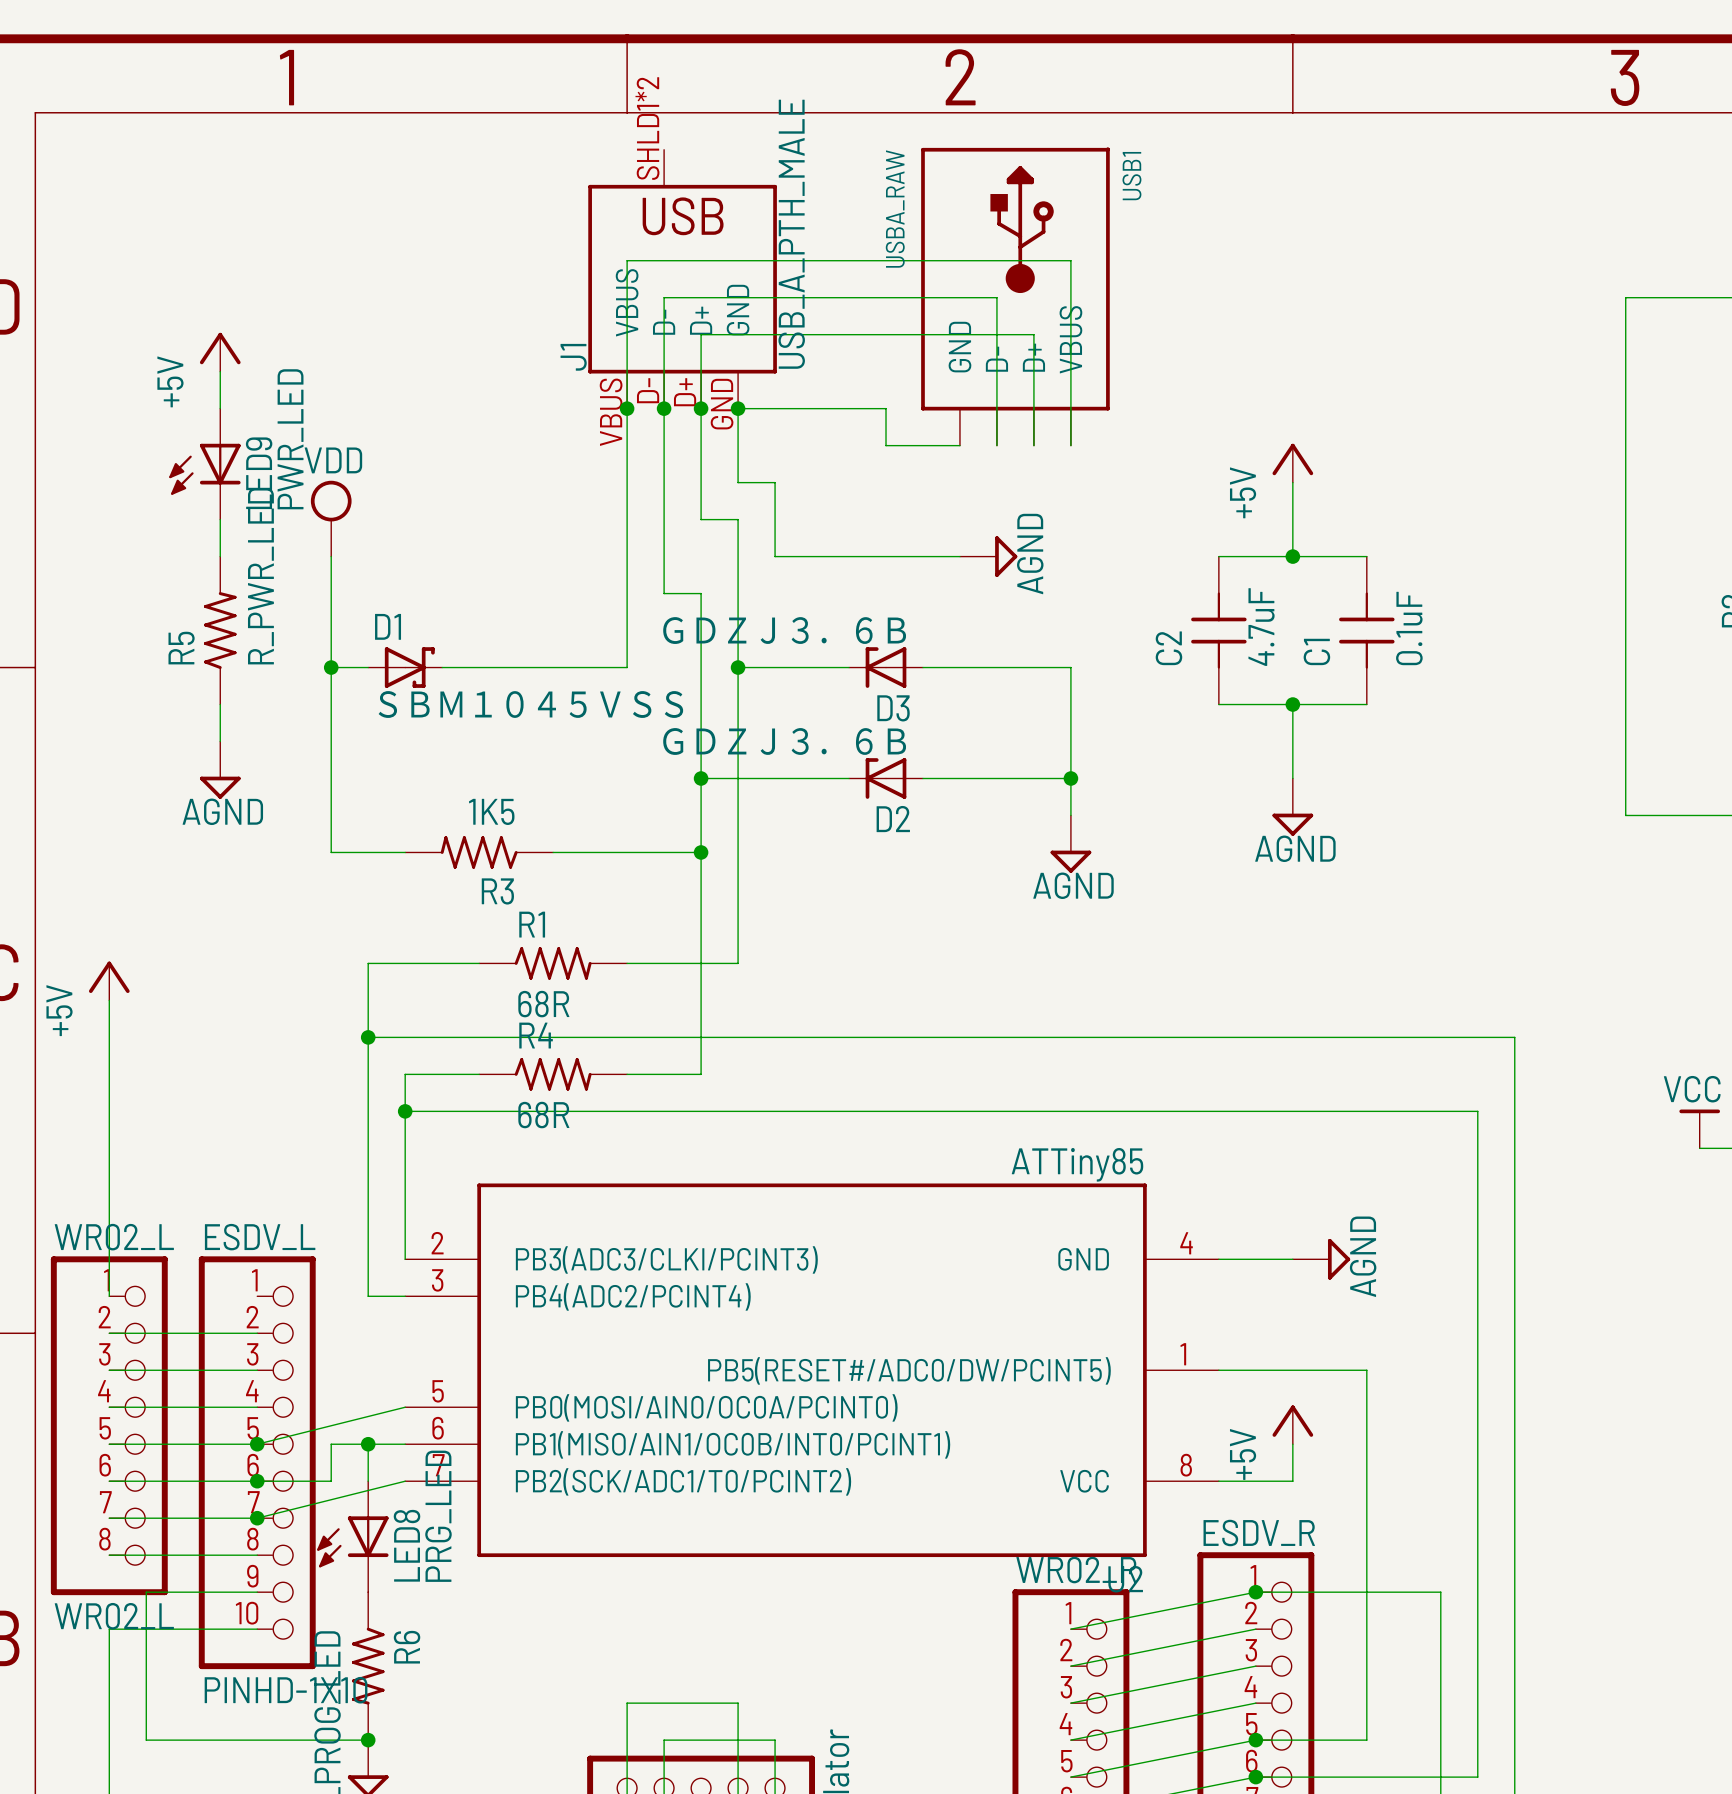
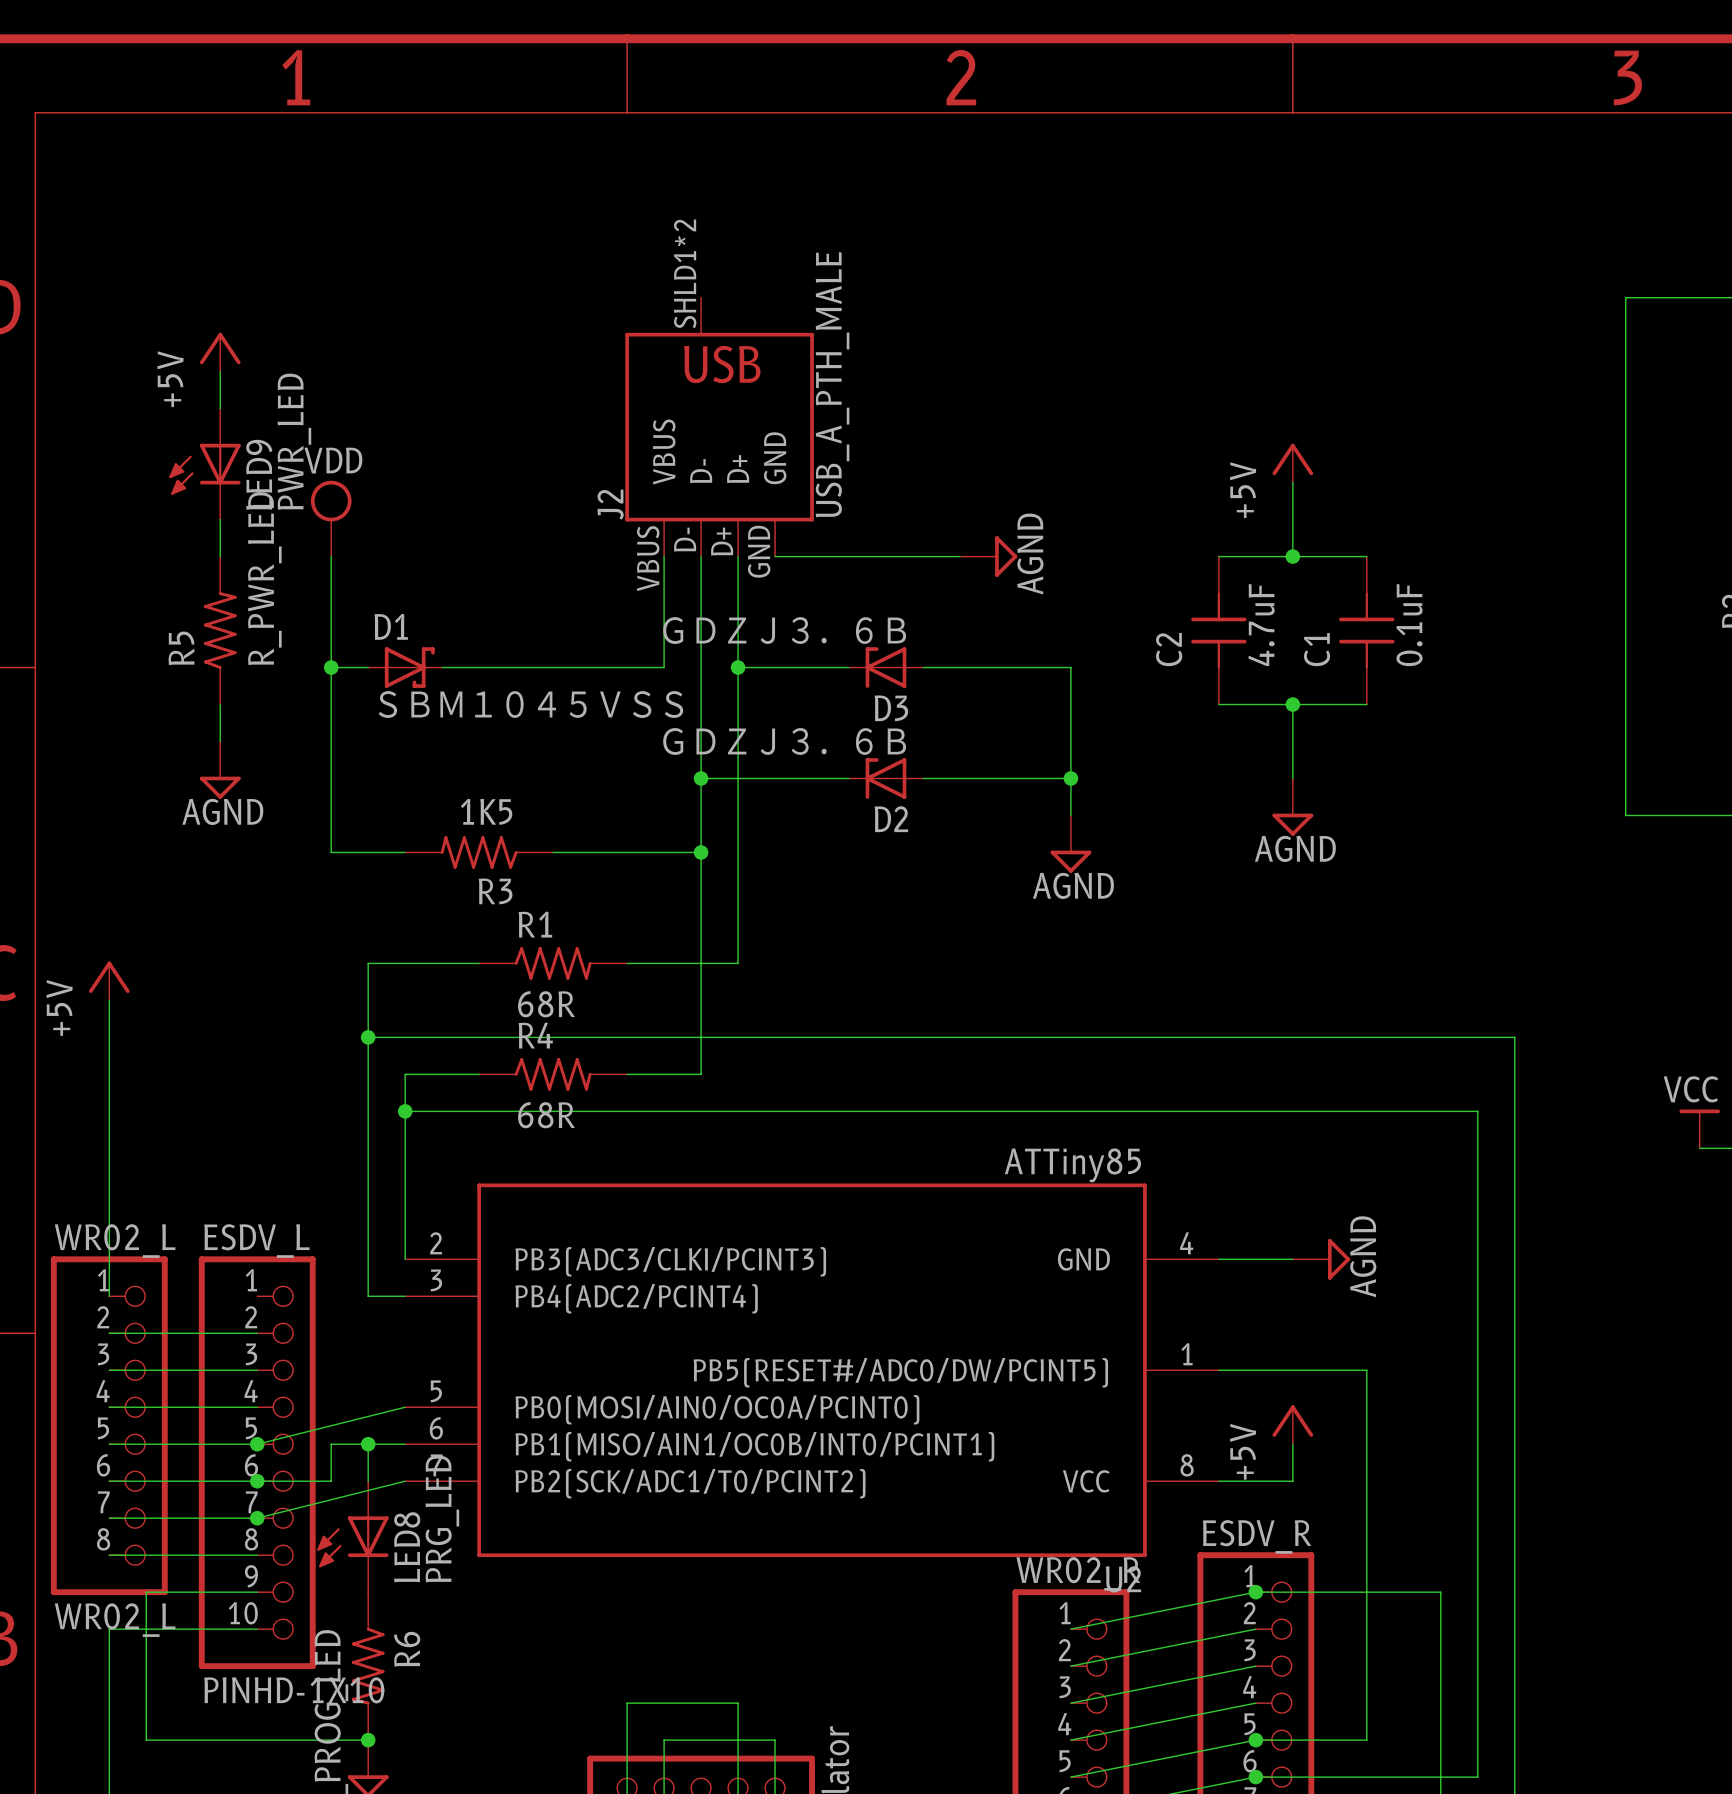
J1: USB_A_PTH_MALE (682, 279) -> none
USB1: USBA_RAW (1015, 296) -> none
junction: (627, 408) -> none
junction: (664, 408) -> none
junction: (701, 408) -> none
junction: (738, 408) -> none
J2: none -> USB_A_PTH_MALE (719, 427)
wire: (959, 445) (886, 445) (886, 408) (738, 408) (738, 482) (775, 482) (775, 556) -> none
wire: (996, 445) (996, 297) (664, 297) (664, 556) -> none
wire: (1033, 445) (1033, 334) (701, 334) (701, 519) (738, 519) (738, 556) -> none
wire: (1070, 445) (1070, 260) (627, 260) (627, 667) -> (664, 593) (664, 667) (627, 667)
wire: (664, 593) (701, 593) -> (701, 556) (701, 593)

